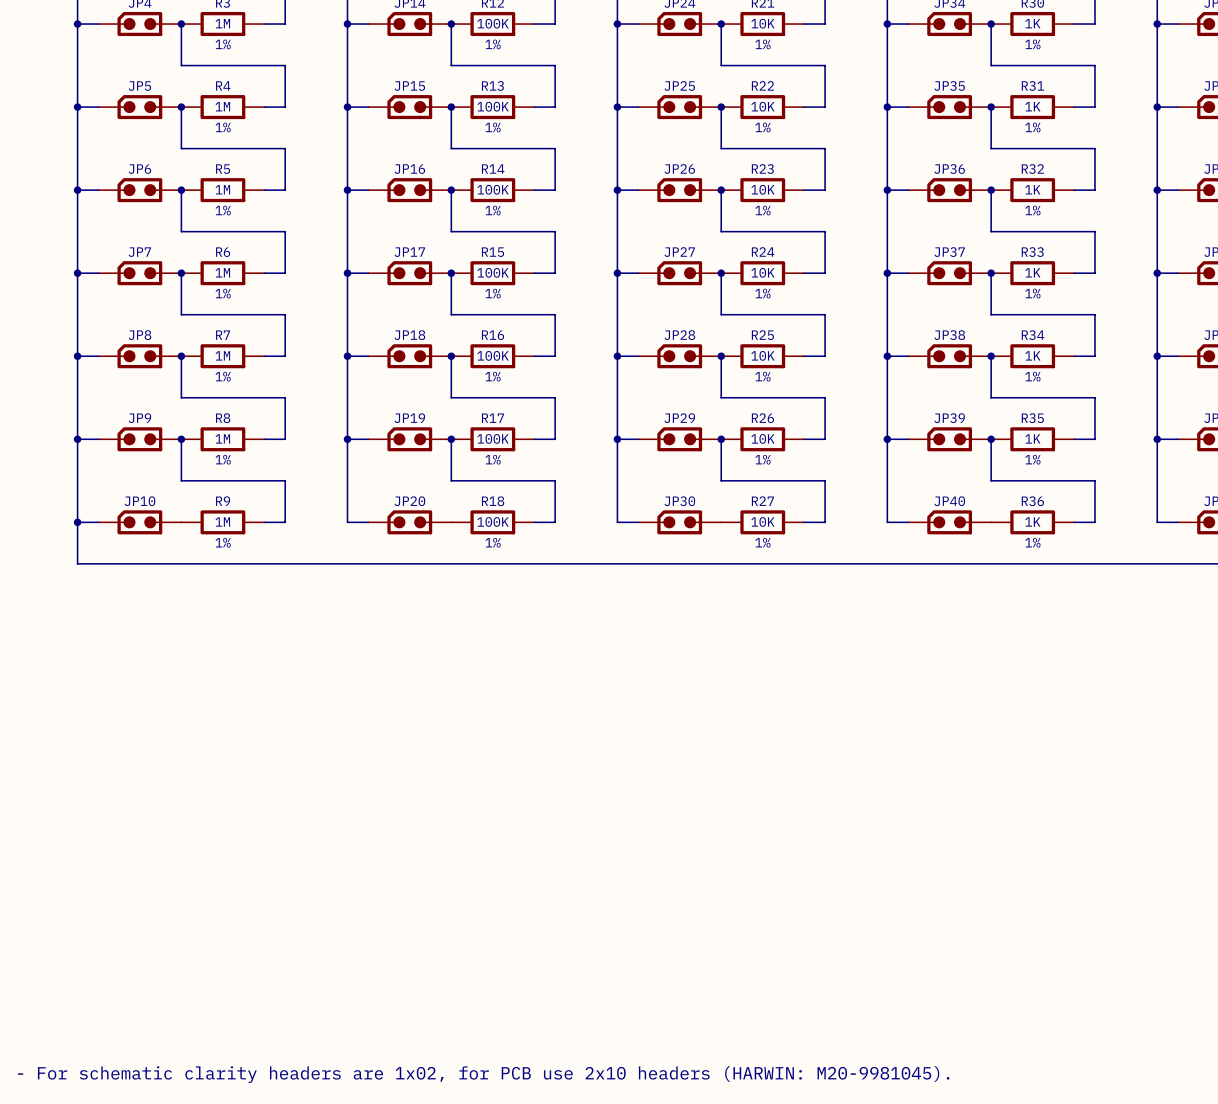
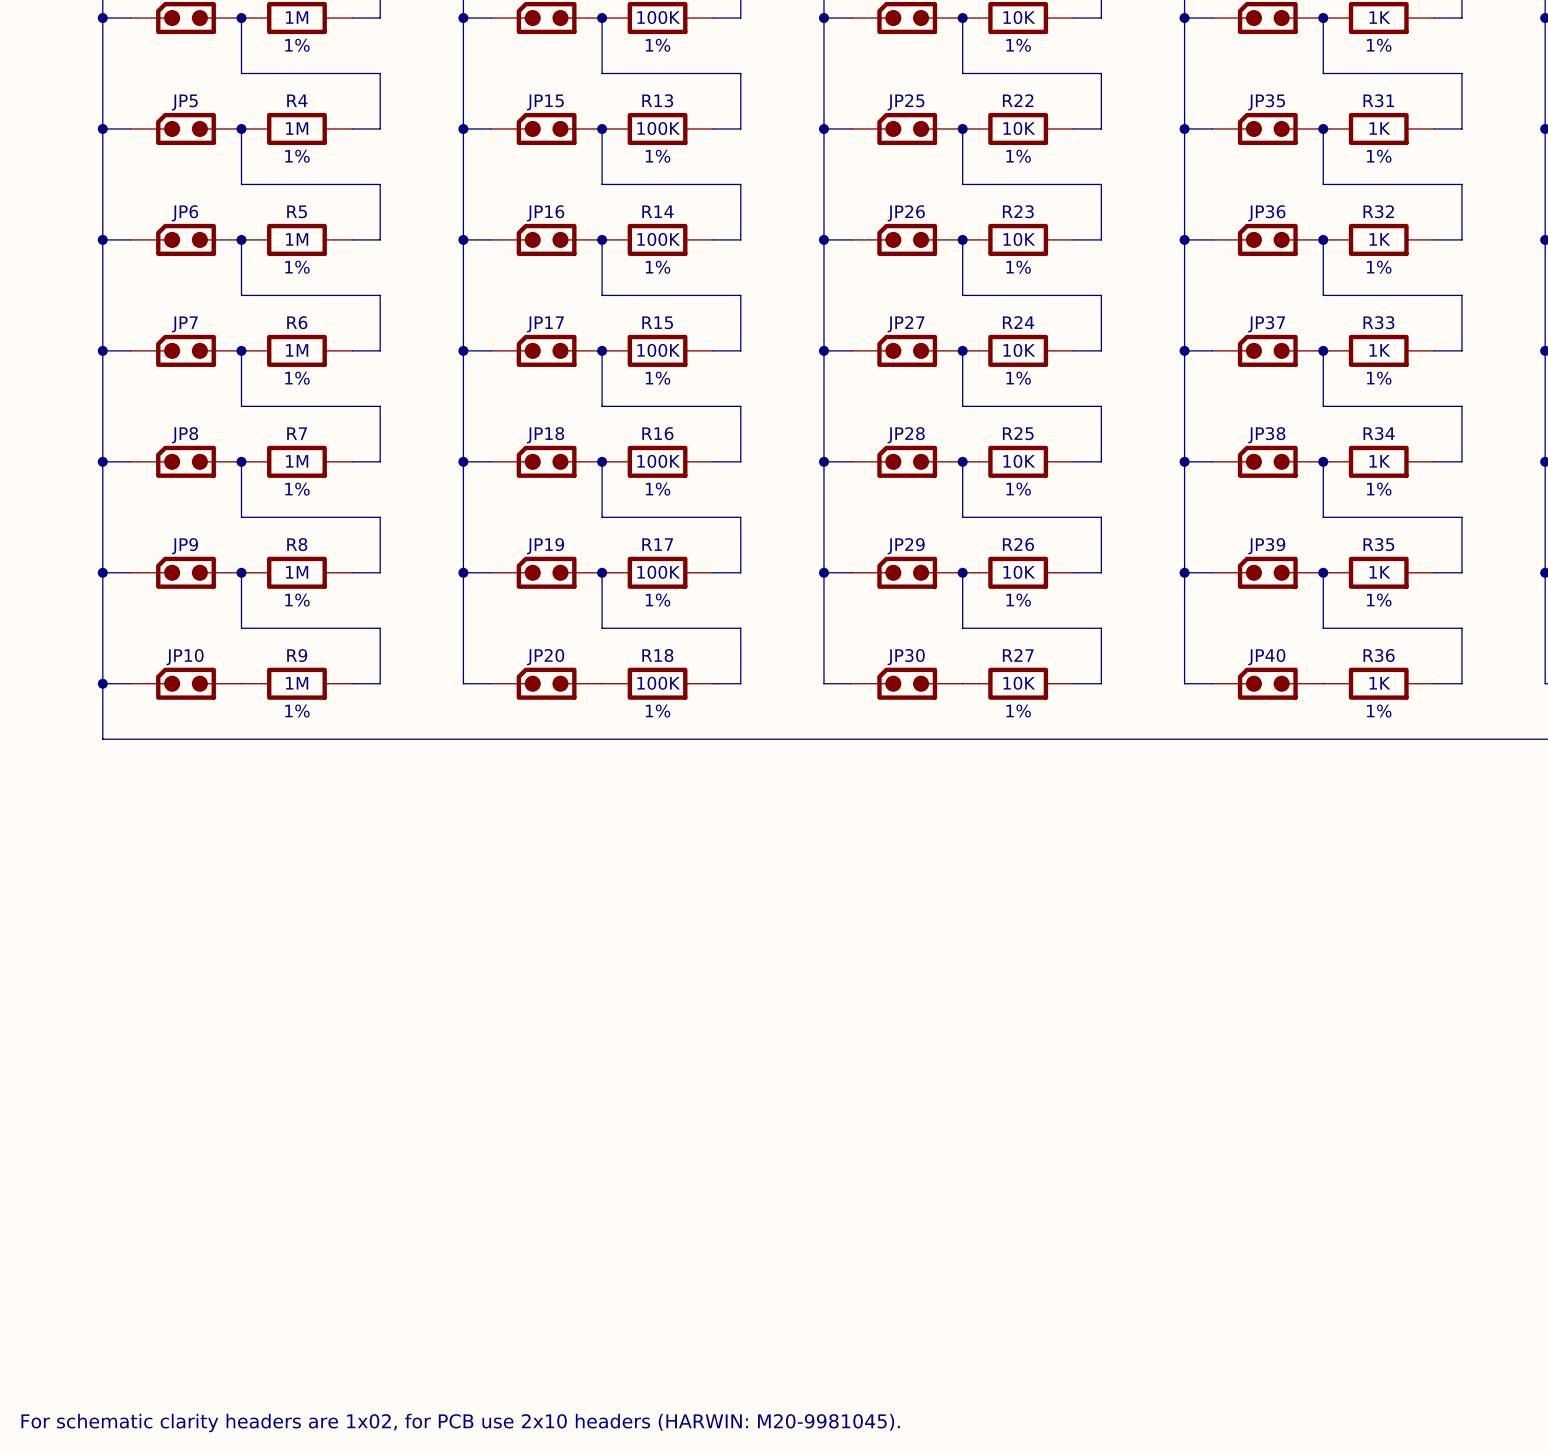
text: - For schematic clarity headers are 1x02, for PCB use 2x10 headers (HARWIN: M20-9981045). (483, 1074) -> For schematic clarity headers are 1x02, for PCB use 2x10 headers (HARWIN: M20-9981045). (460, 1422)

